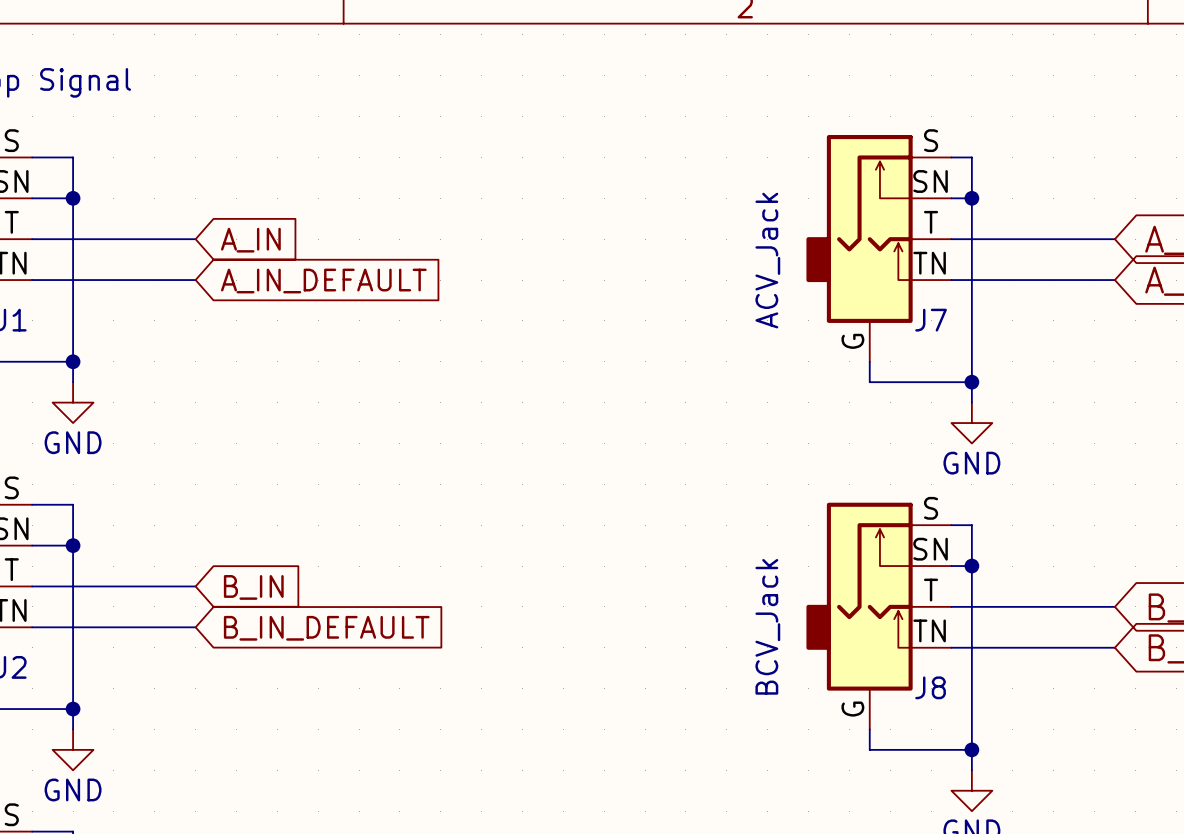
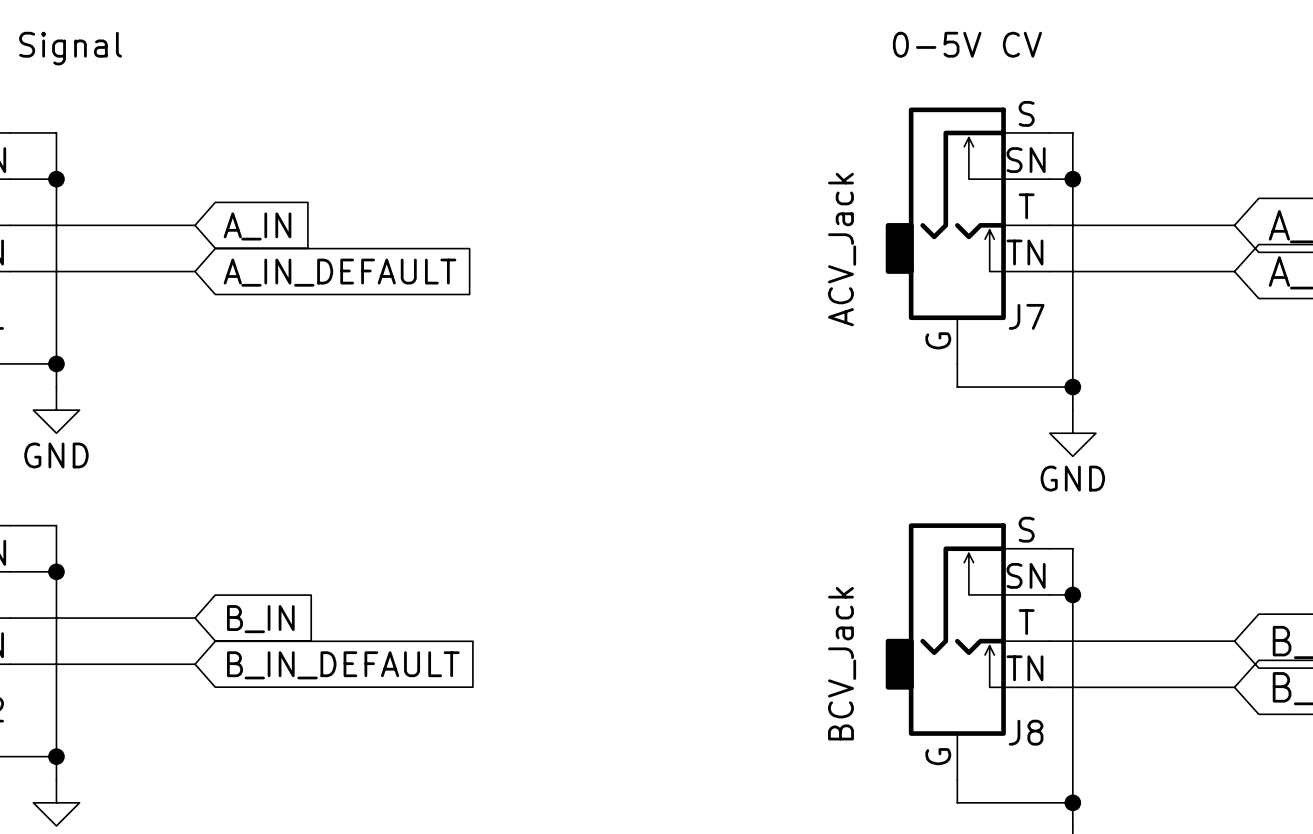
text: none -> 0-5V CV (967, 44)

